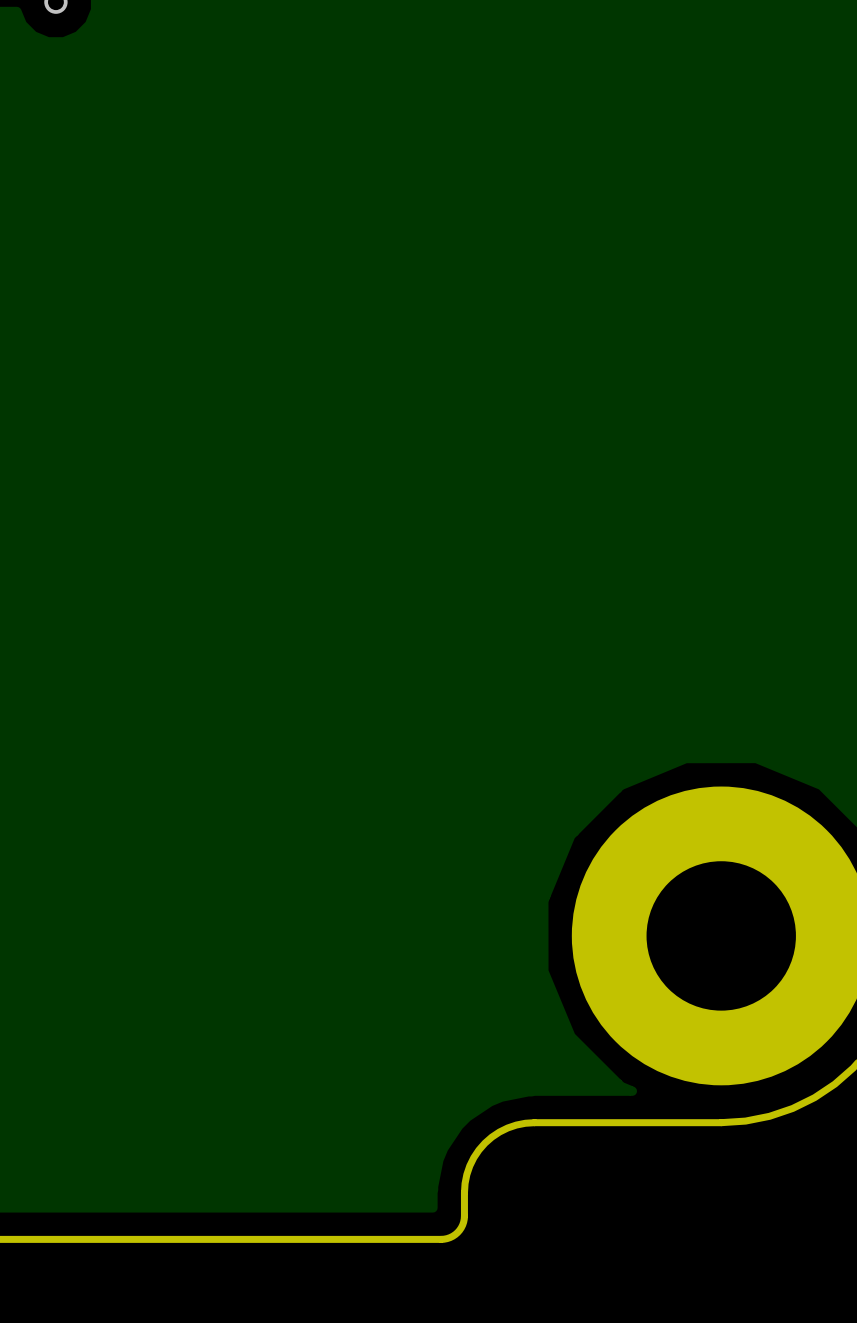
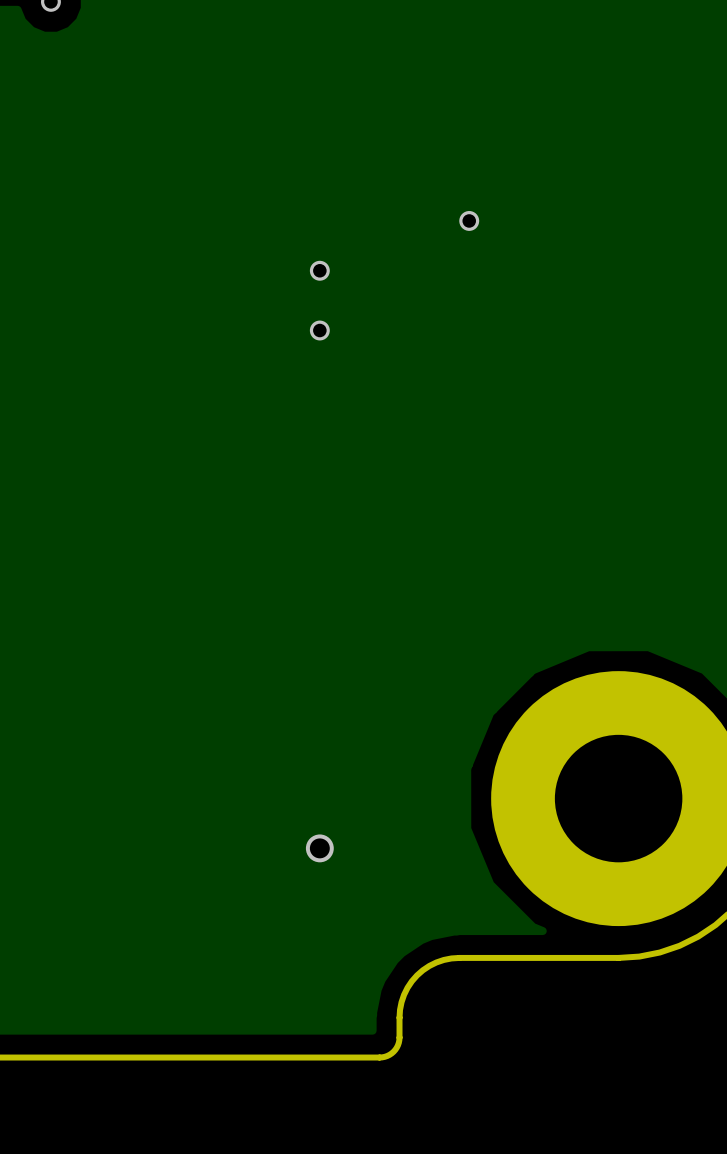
via: none -> (469, 220)
via: none -> (319, 270)
via: none -> (319, 330)
via: none -> (319, 848)

